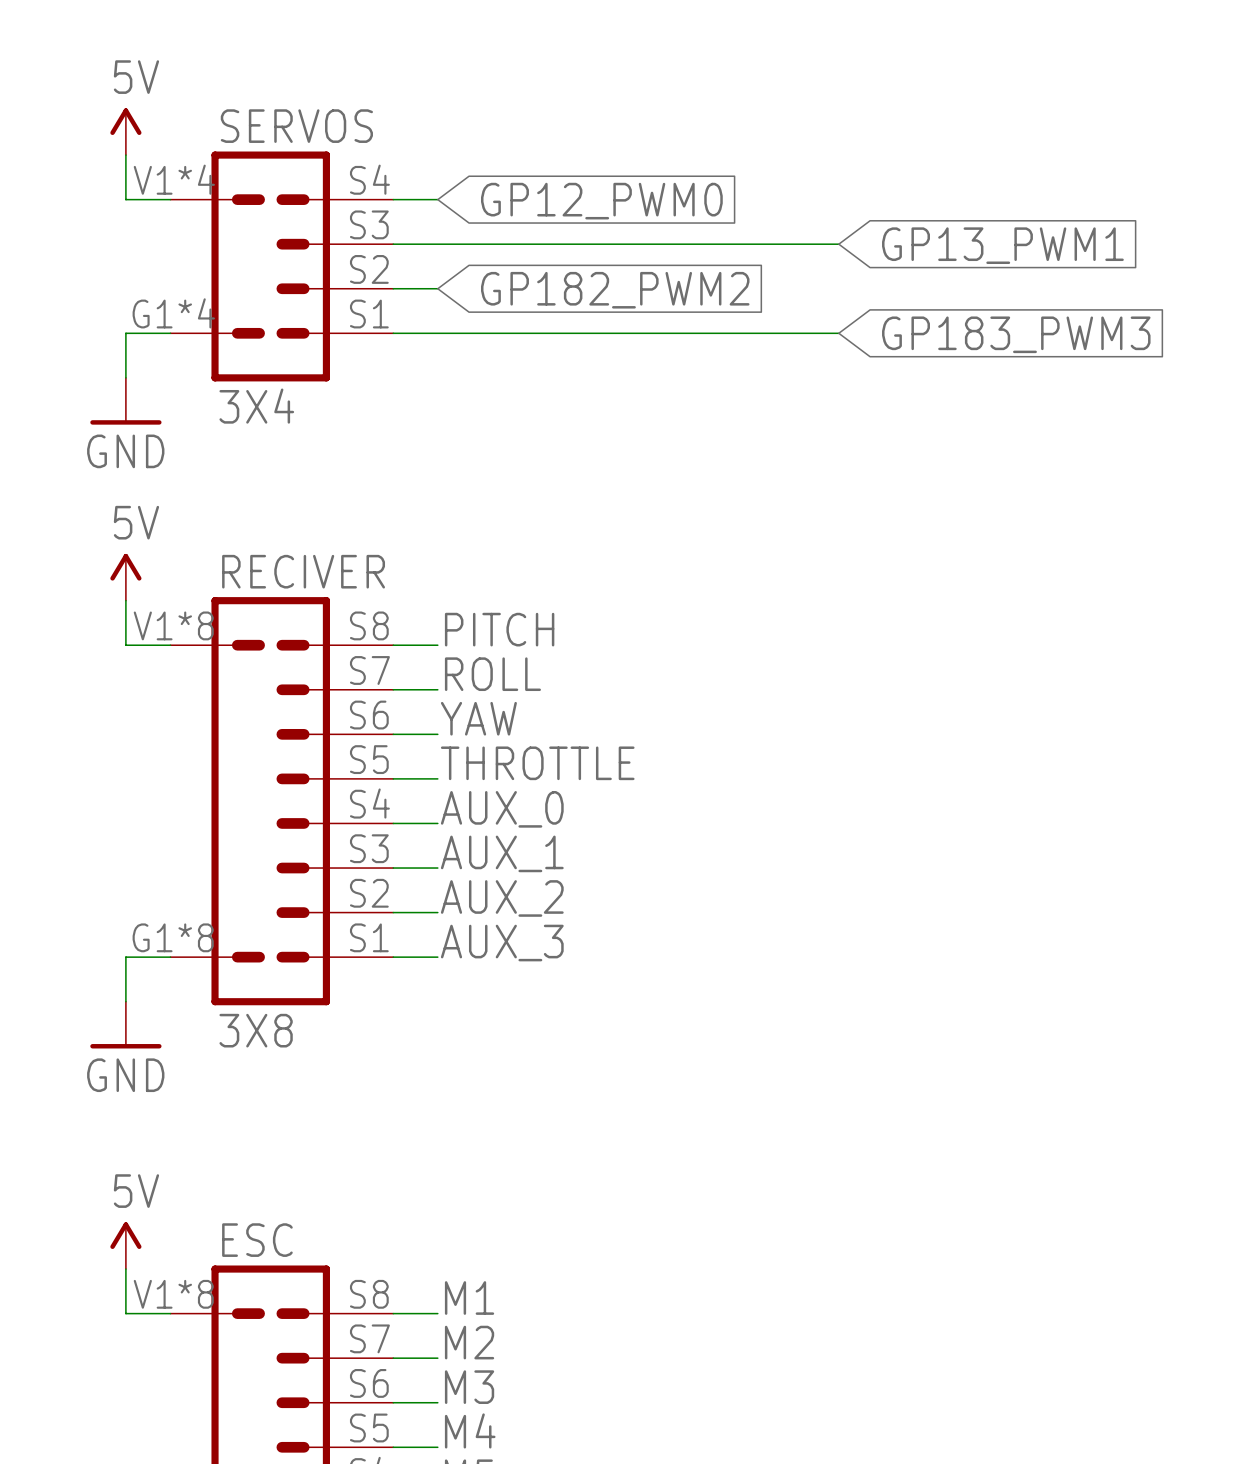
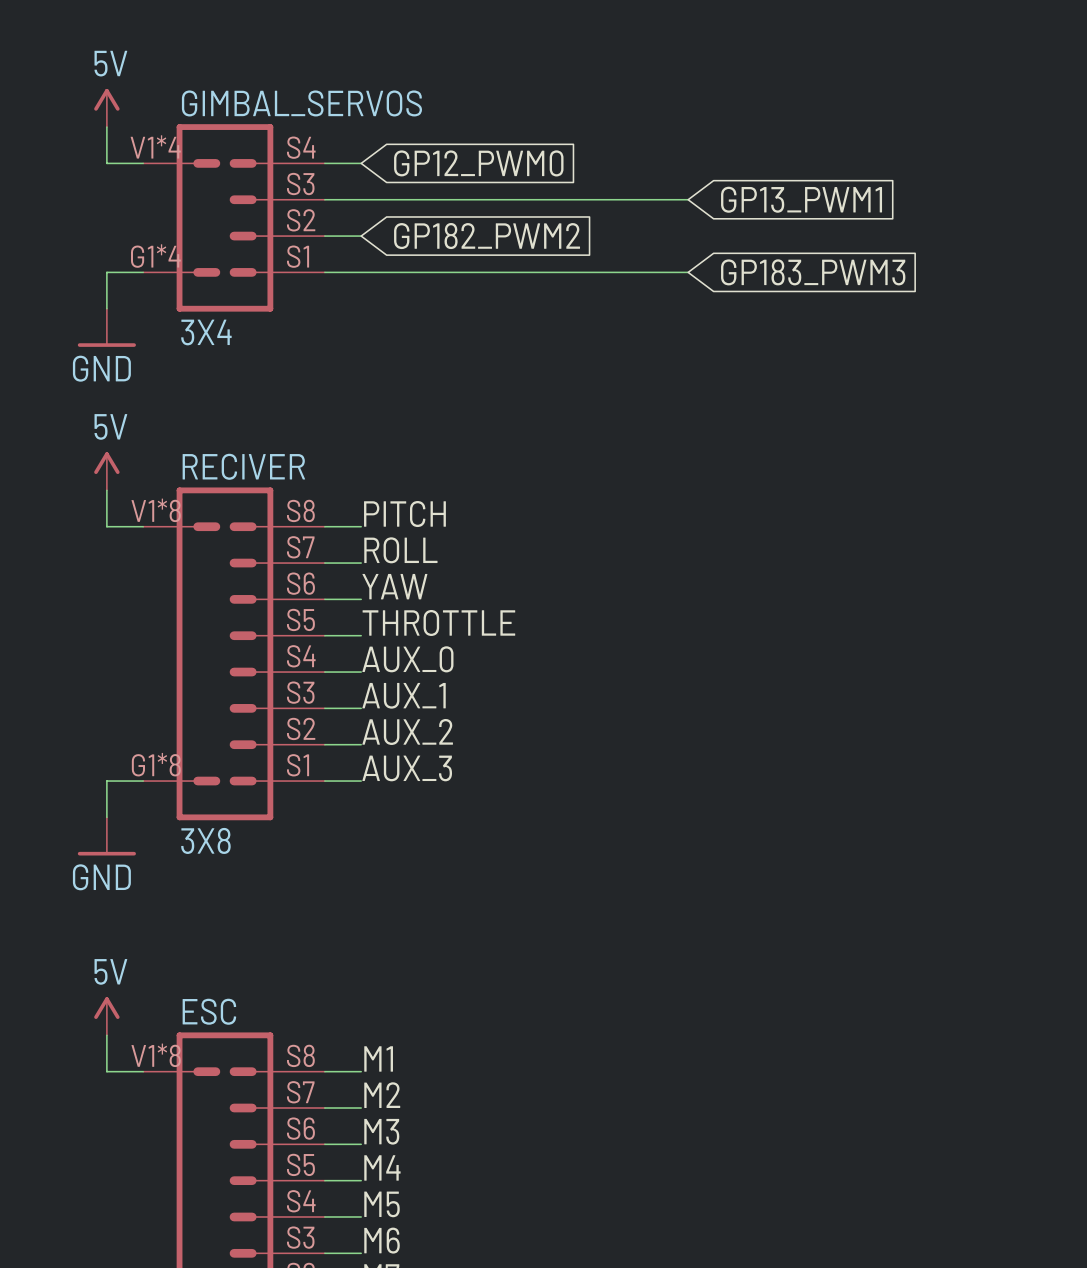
SERVOS name: SERVOS (296, 126) -> GIMBAL_SERVOS (301, 103)

